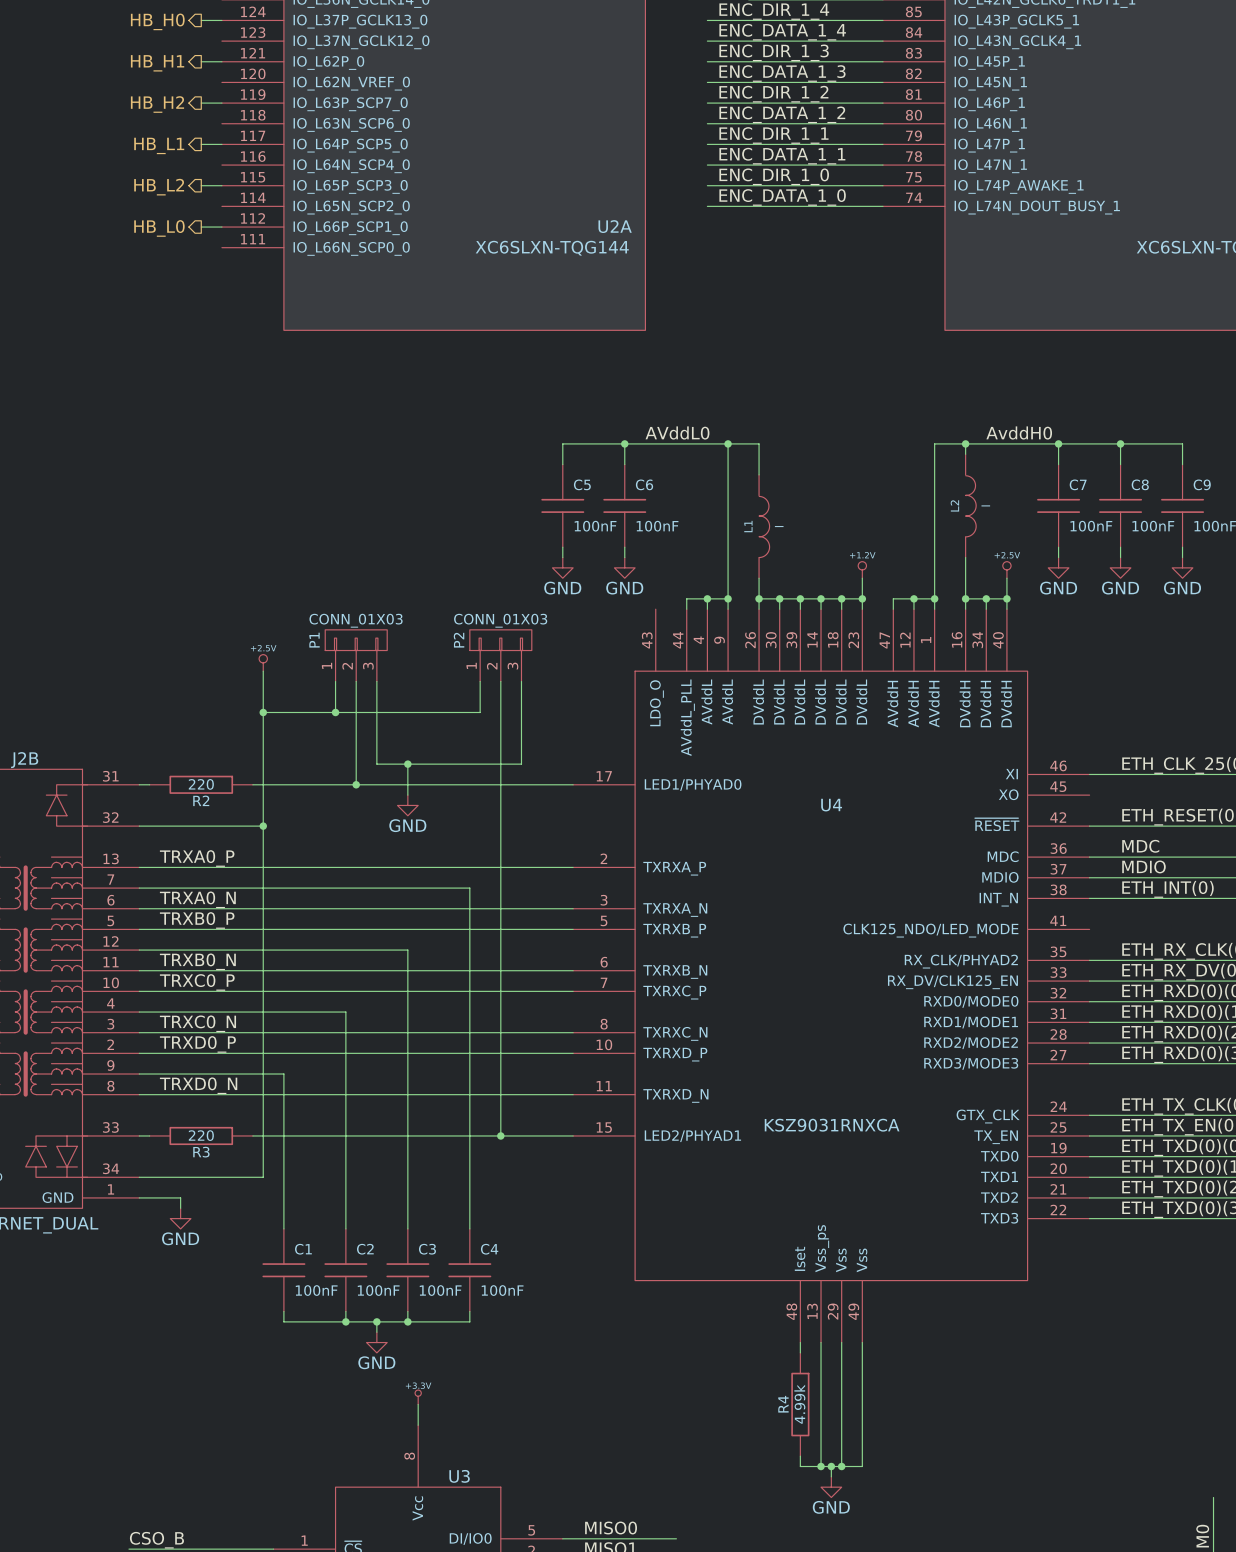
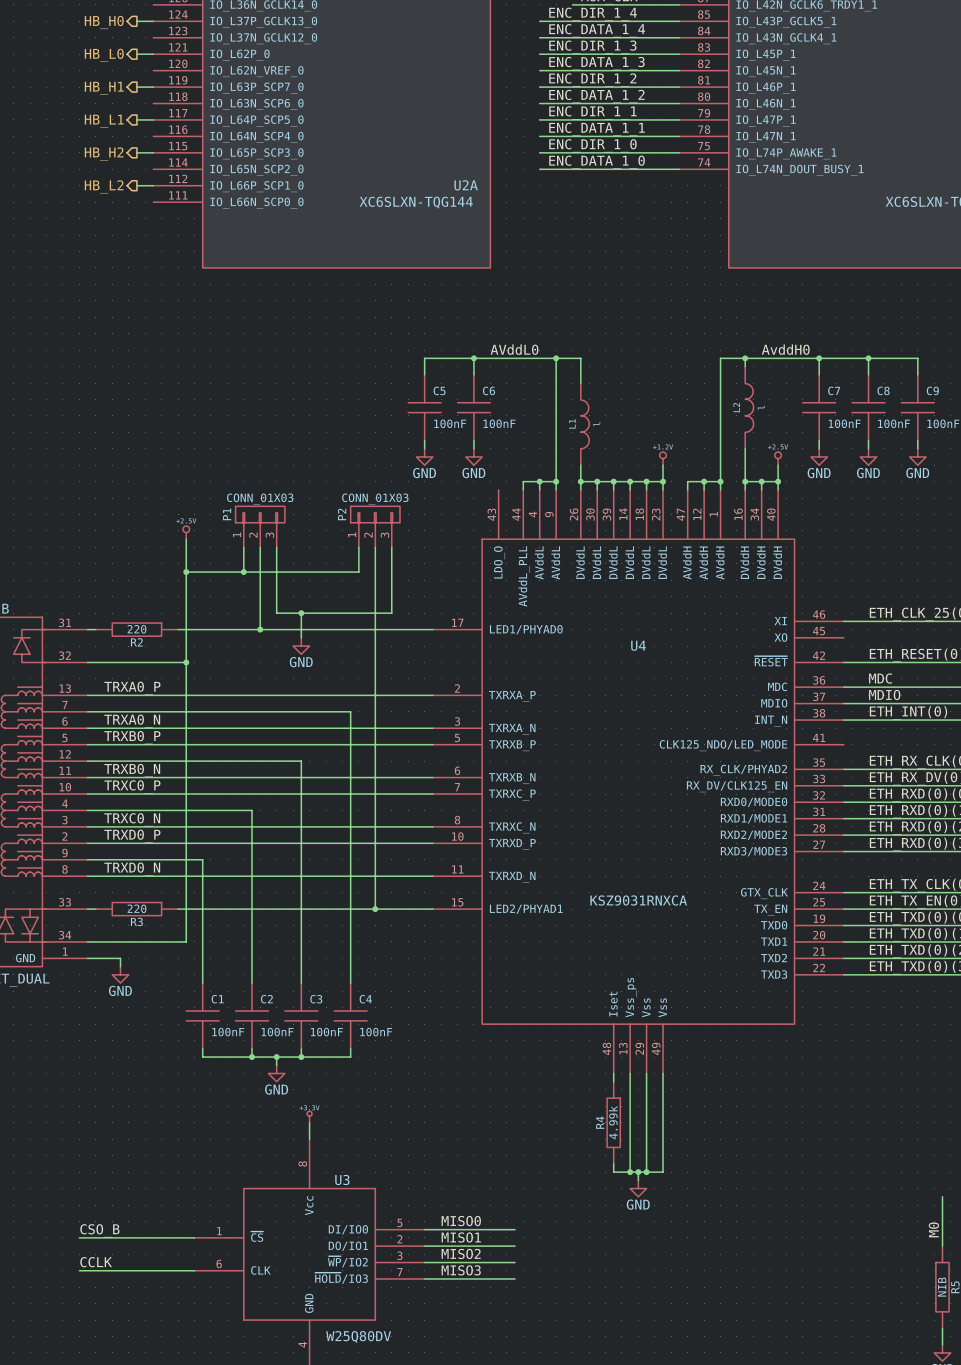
hierarchical label: HB_H1 (157, 63) -> HB_L0 (104, 55)
hierarchical label: HB_H2 (157, 104) -> HB_H1 (104, 88)
hierarchical label: HB_L2 (159, 187) -> HB_H2 (104, 153)
hierarchical label: HB_L0 (159, 228) -> HB_L2 (104, 186)

